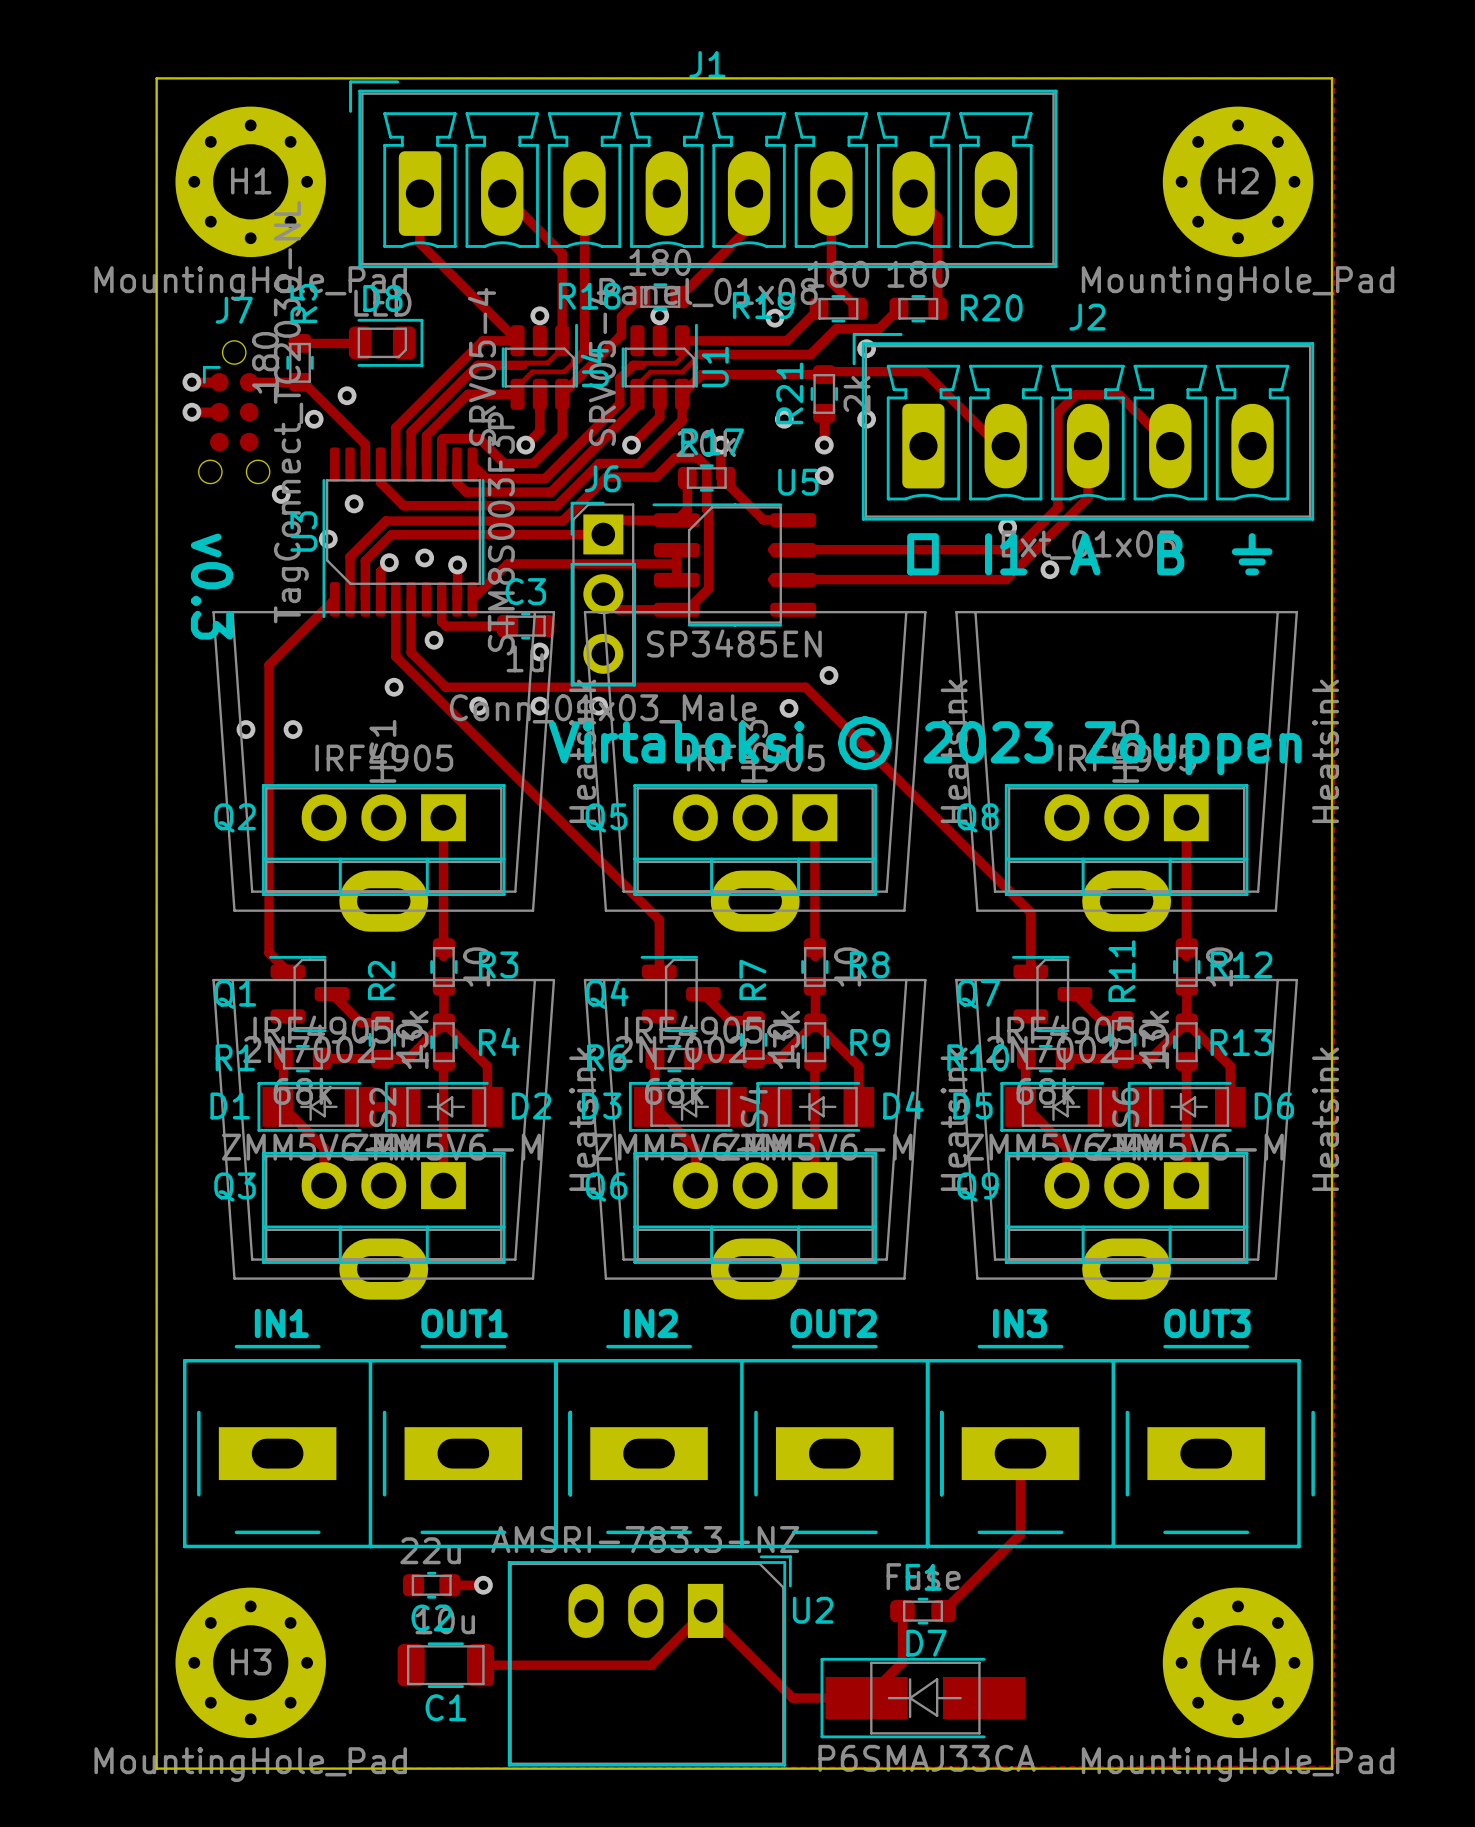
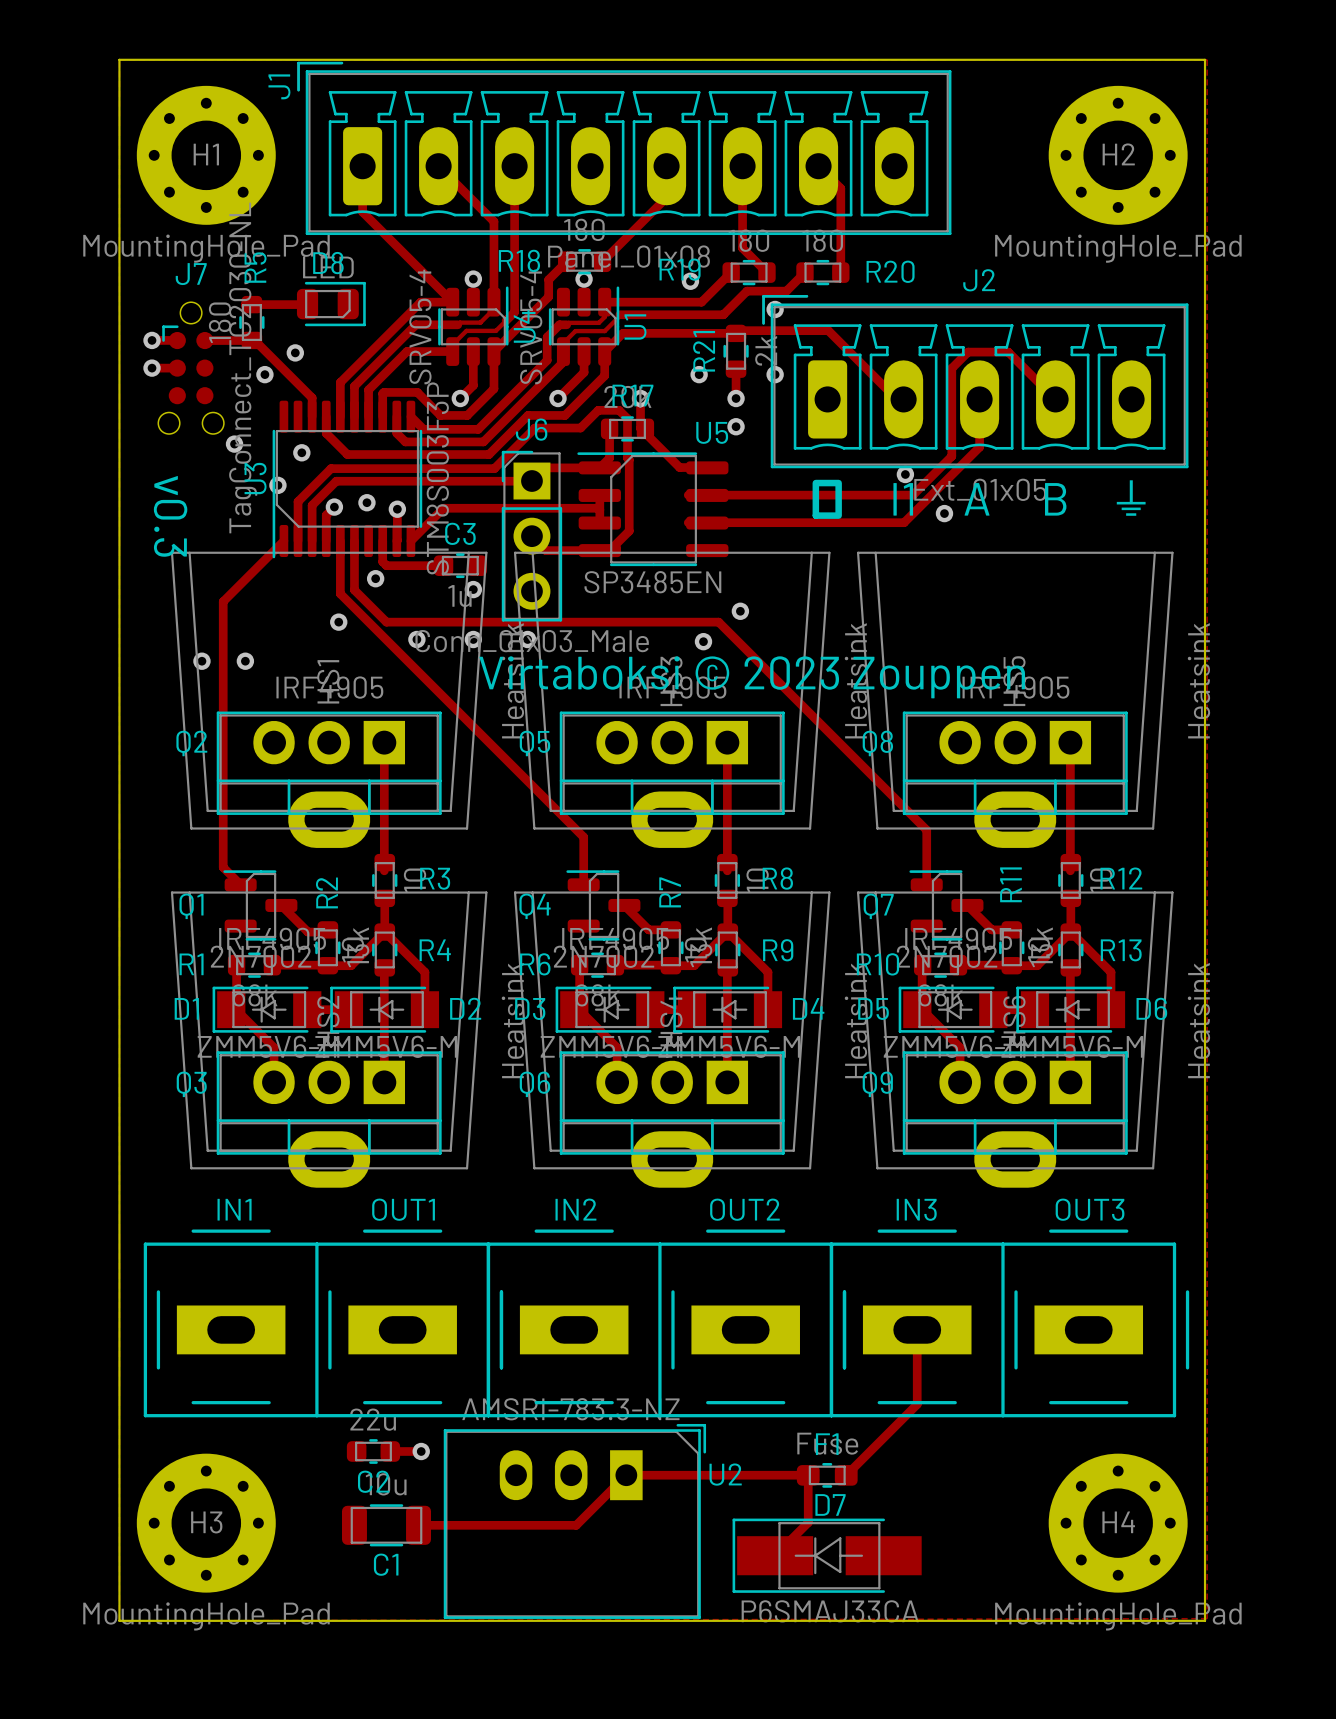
J1 name rotation: 0° (707, 64) -> 90° counterclockwise (279, 86)
J1 name position: J1 (707, 64) -> J1 (279, 86)
track: (705, 1610) (792, 1698) (866, 1698) -> (626, 1475) (808, 1475)

